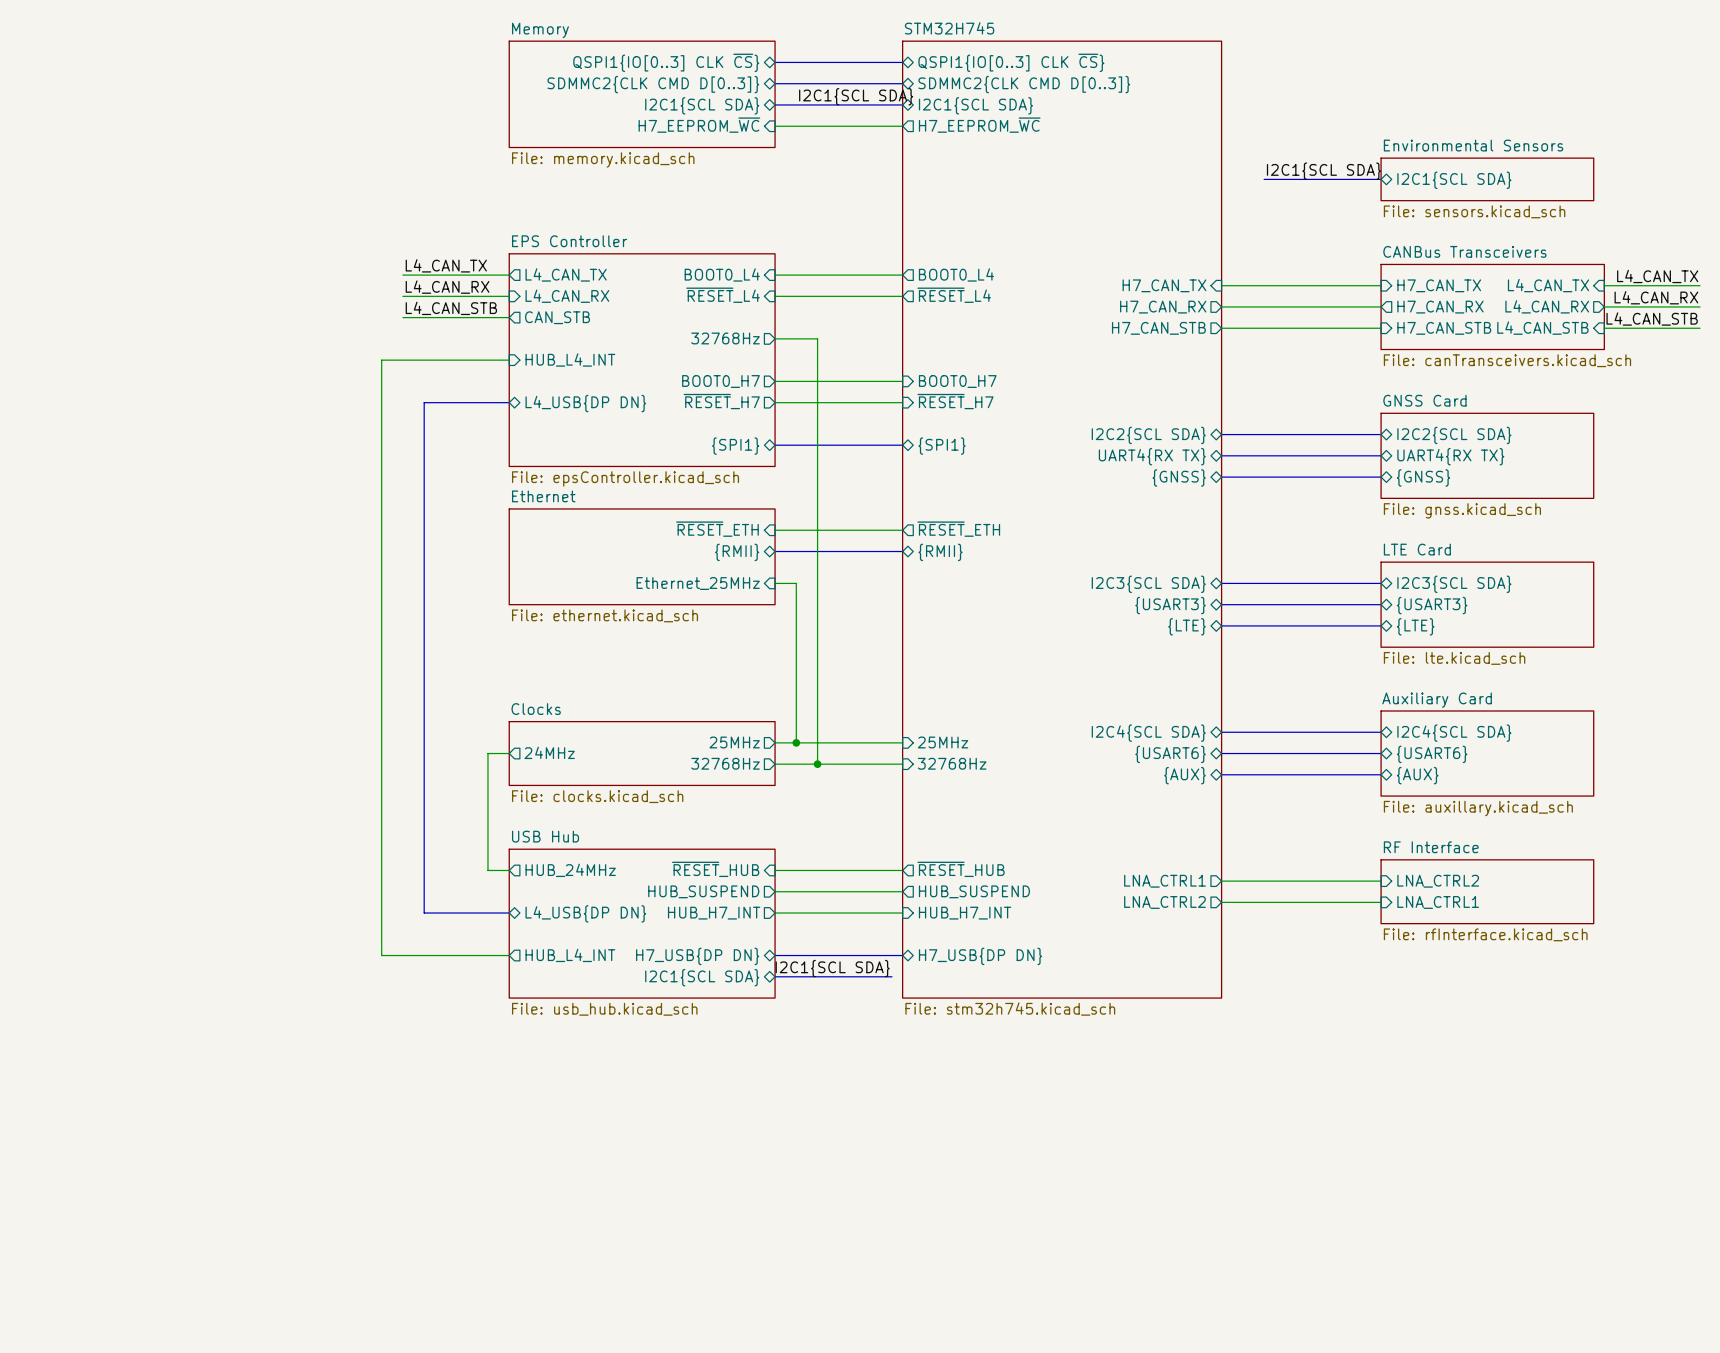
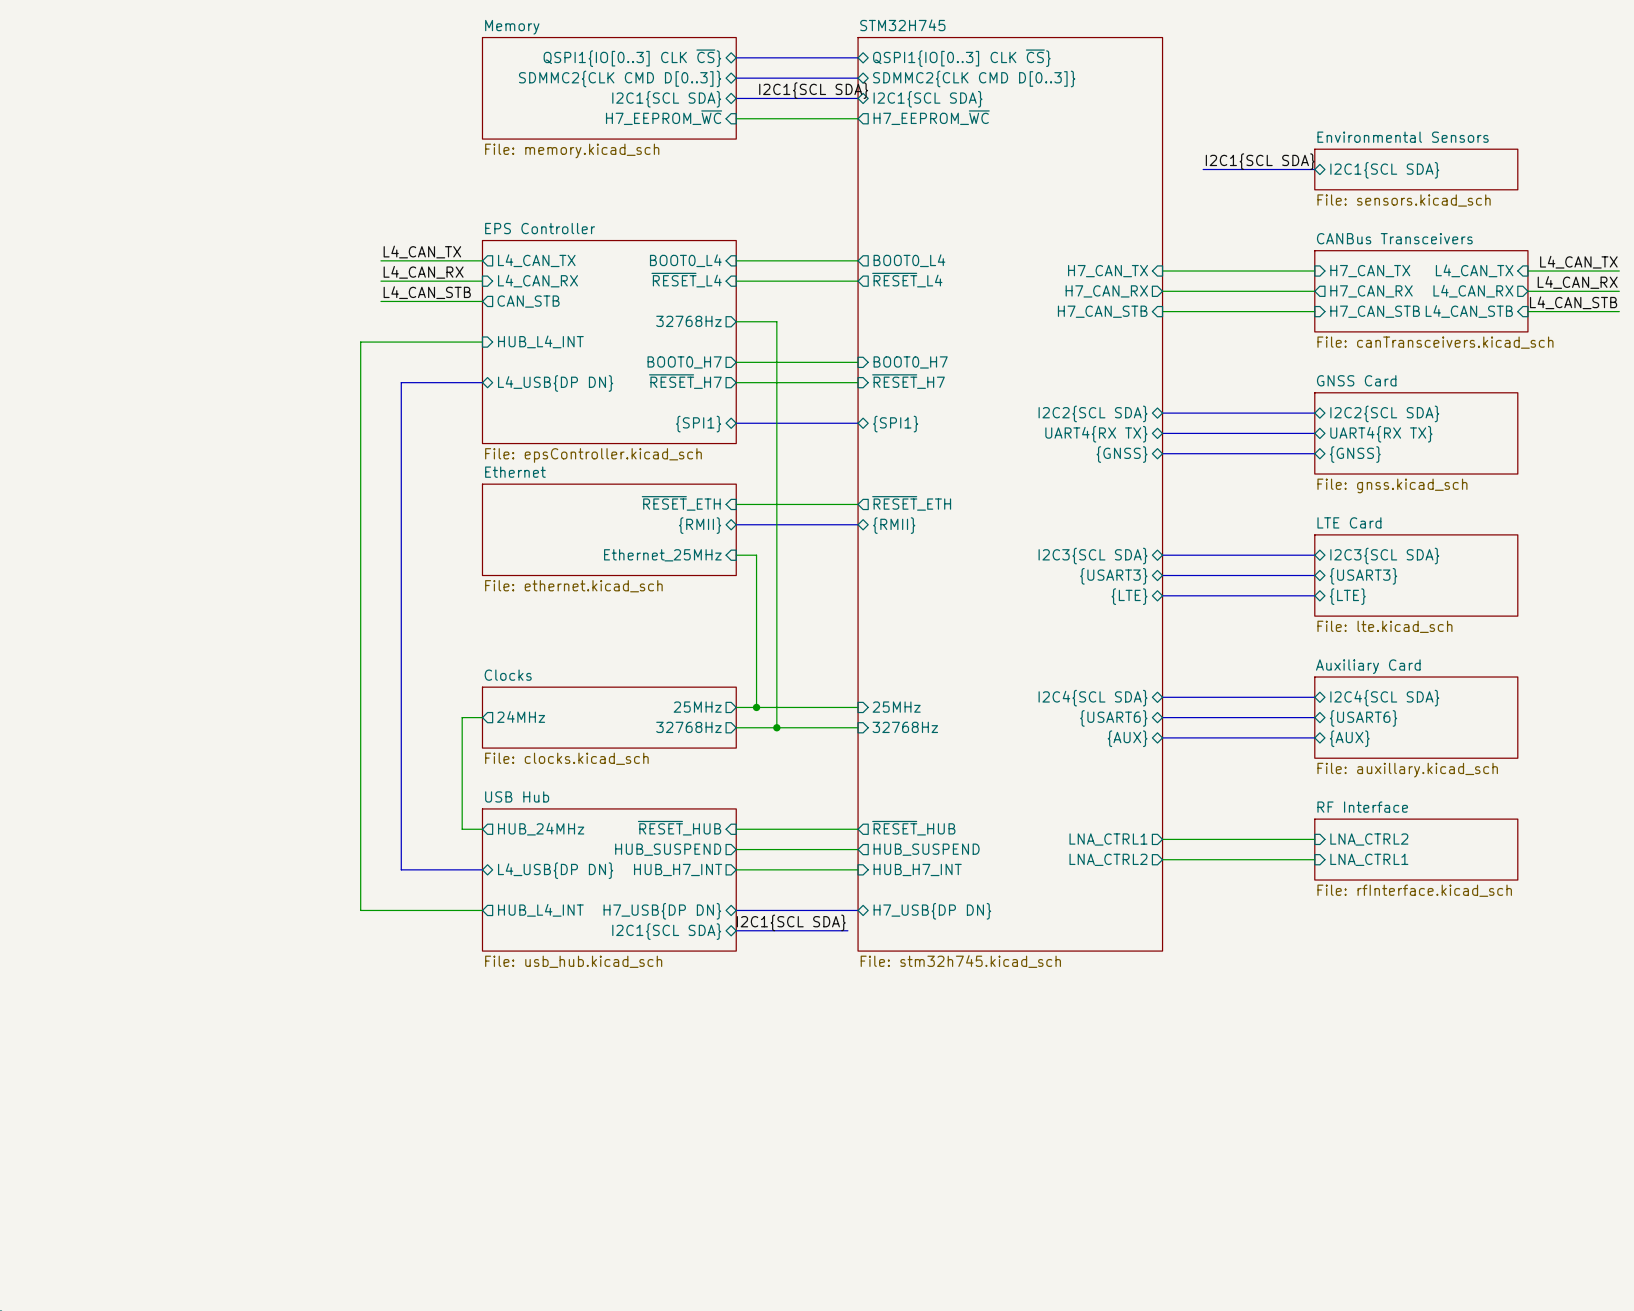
sheet pin shape: output (1158, 328) -> input (1102, 311)

